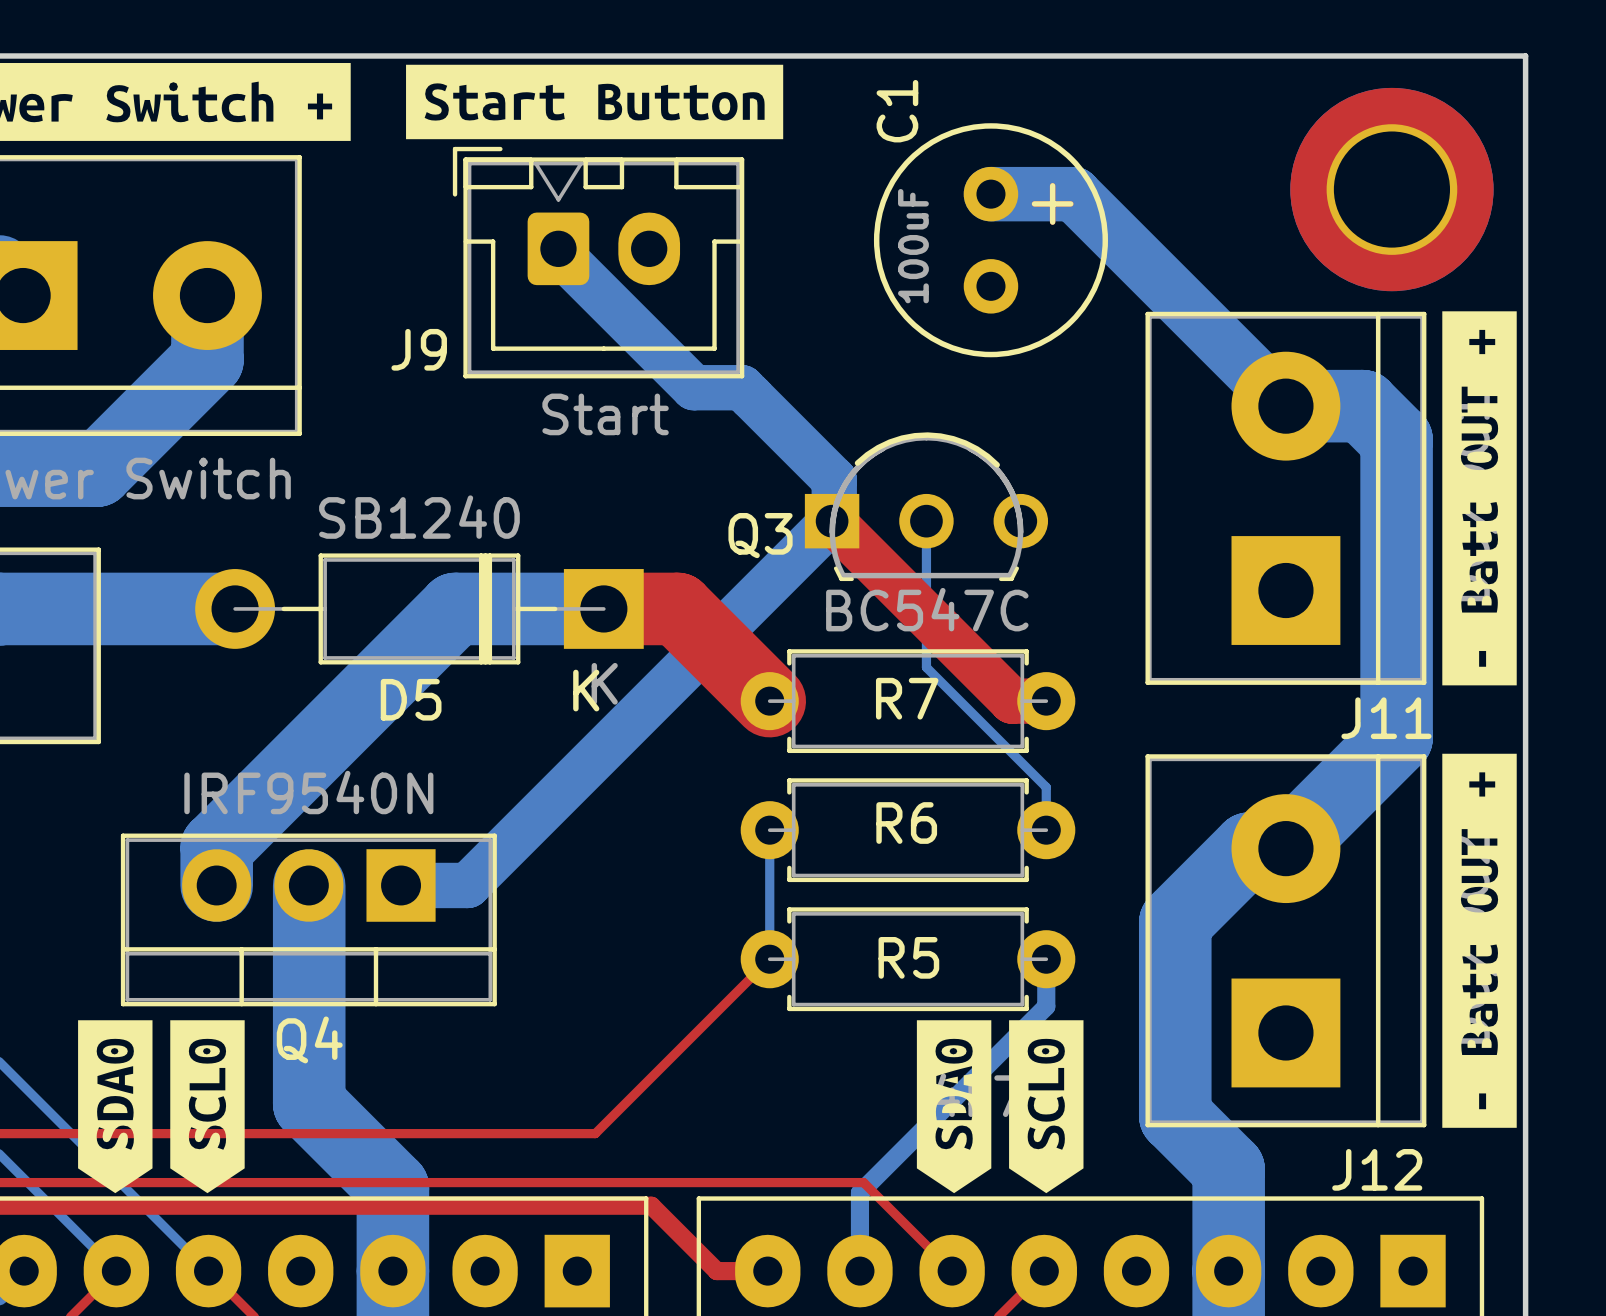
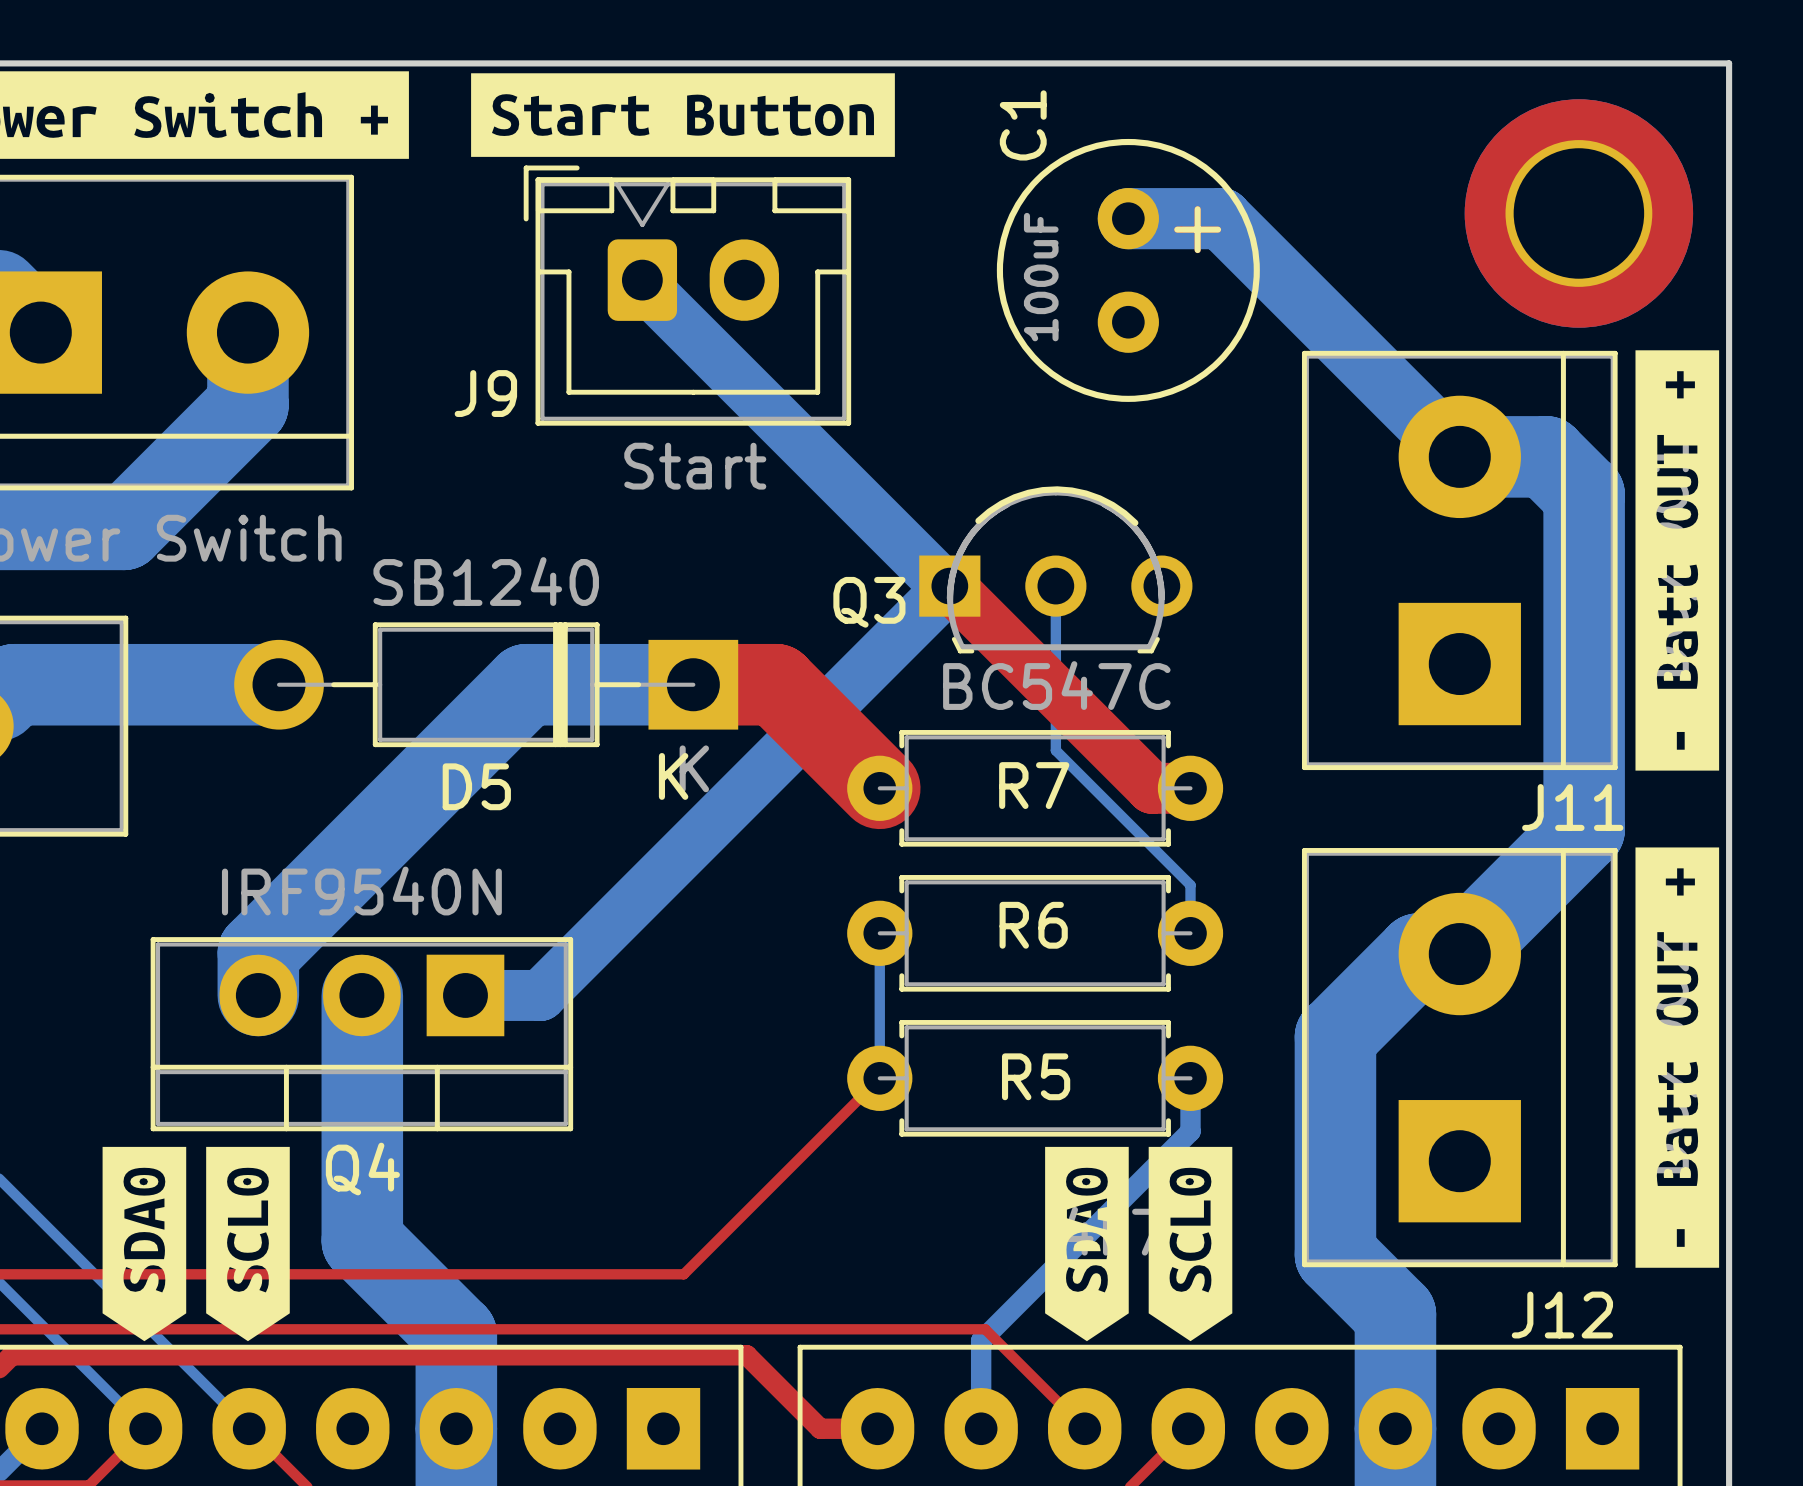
bottom track: (693, 387) (742, 387) (834, 479) (834, 518) (832, 521) -> (794, 436) (944, 586) (949, 586)

